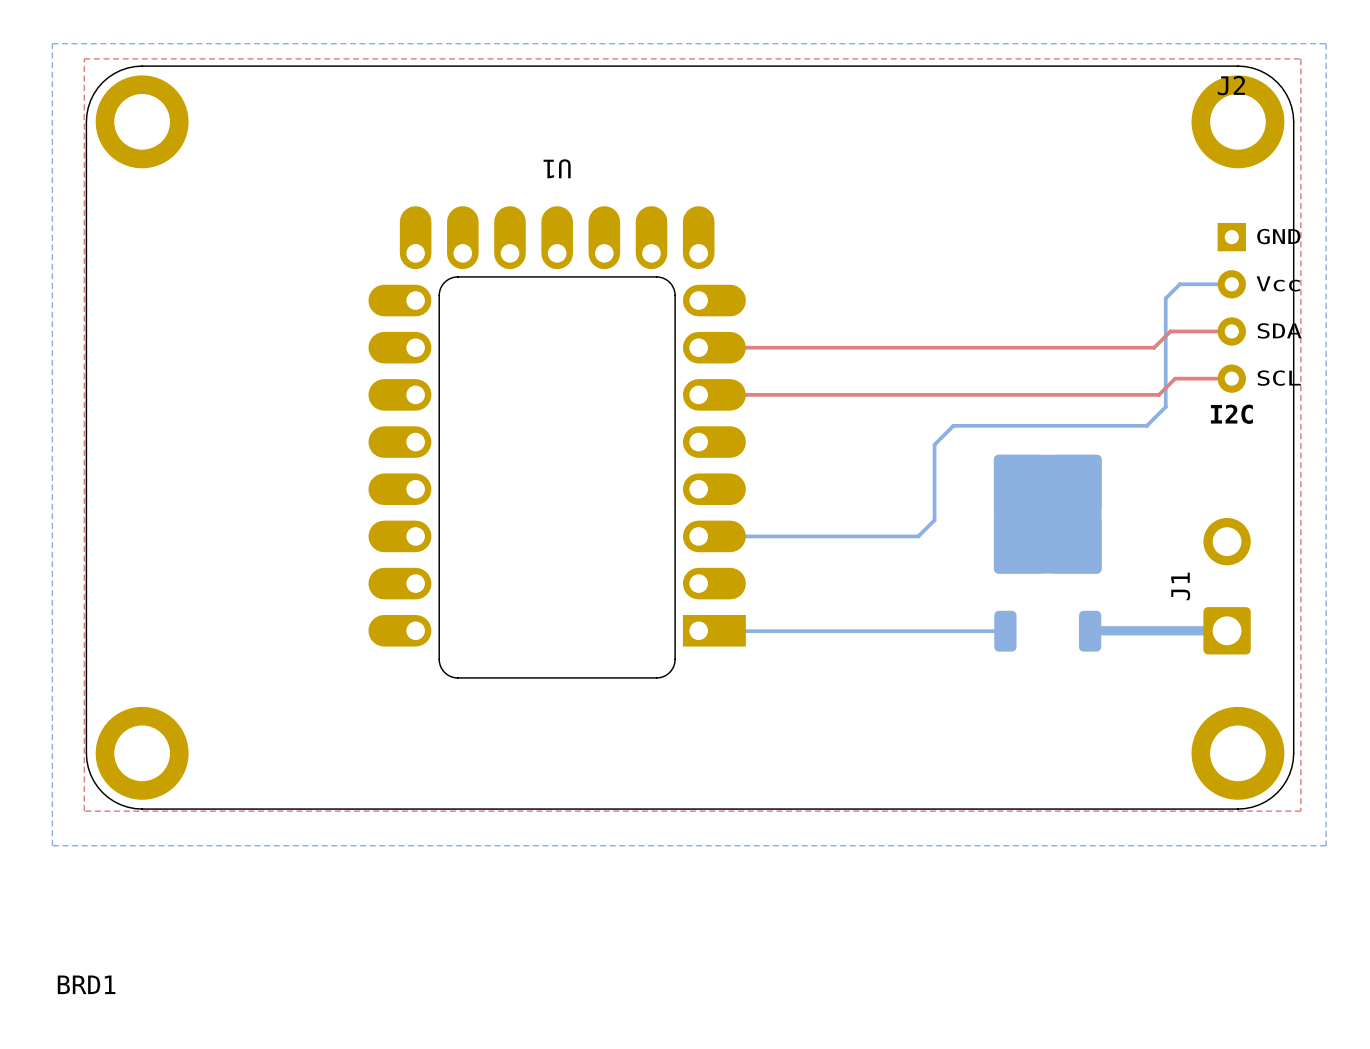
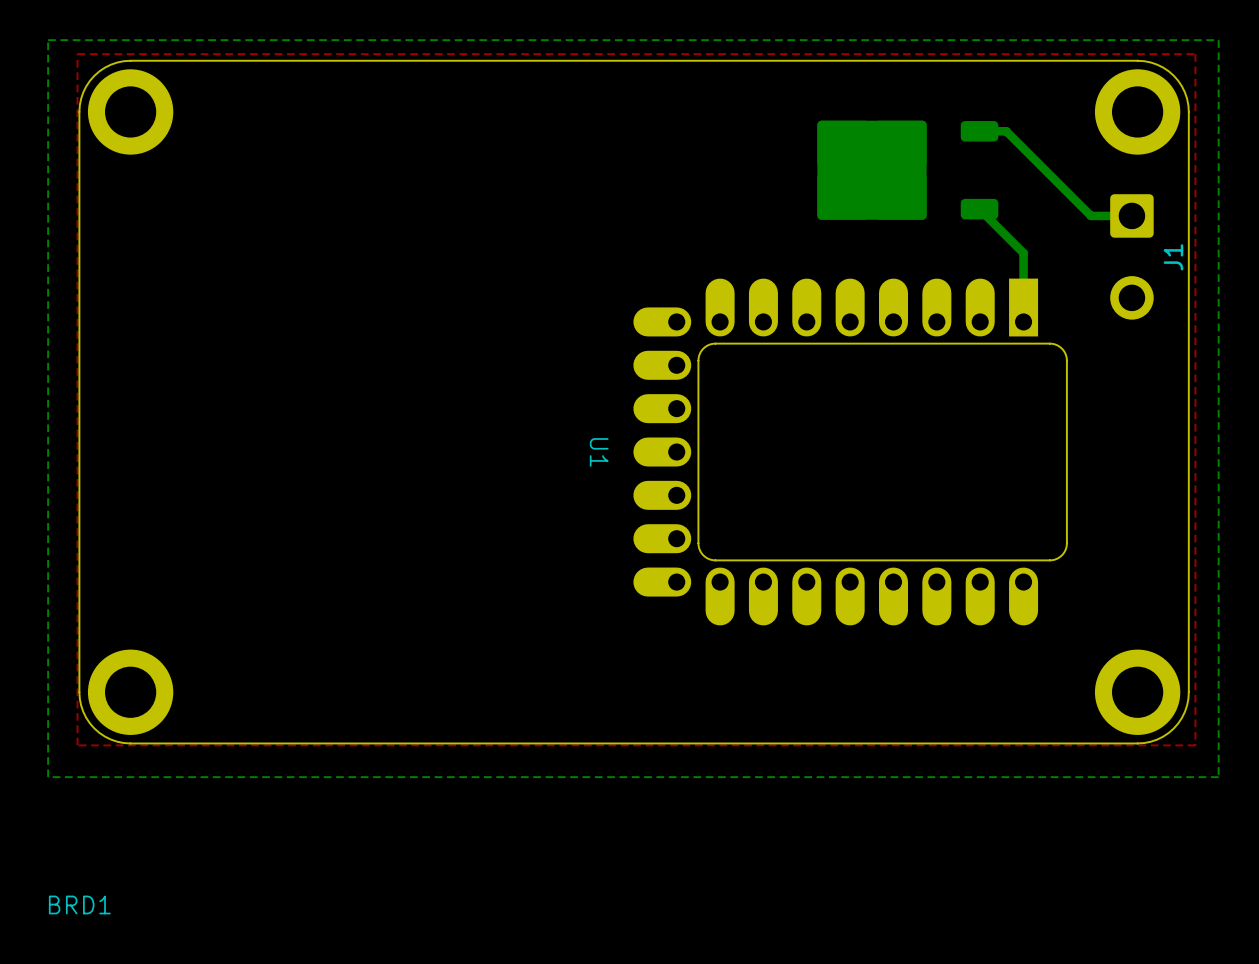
bottom track: none -> (979, 131) (1006, 131) (1090, 215) (1131, 215)
bottom track: none -> (979, 209) (1023, 253) (1023, 321)
bottom track: (1231, 284) (1179, 284) (1165, 298) (1165, 406) (1146, 425) (953, 425) (934, 444) (934, 520) (918, 536) (698, 536) -> none
J2: (1231, 307) -> none
top track: (1231, 331) (1170, 331) (1154, 347) (698, 347) -> none
top track: (1231, 378) (1175, 378) (1158, 394) (698, 394) -> none
U1 rotation: 0° (557, 442) -> 90° counterclockwise (850, 452)
U1 position: (557, 442) -> (850, 452)
part rotation: 0° (1047, 553) -> 90° counterclockwise (907, 170)
part position: (1047, 553) -> (907, 170)
J1 rotation: 0° (1227, 586) -> 180° (1131, 256)
J1 position: (1227, 586) -> (1131, 256)
bottom track: (698, 630) (1005, 631) -> none
bottom track: (1227, 630) (1090, 631) -> none

